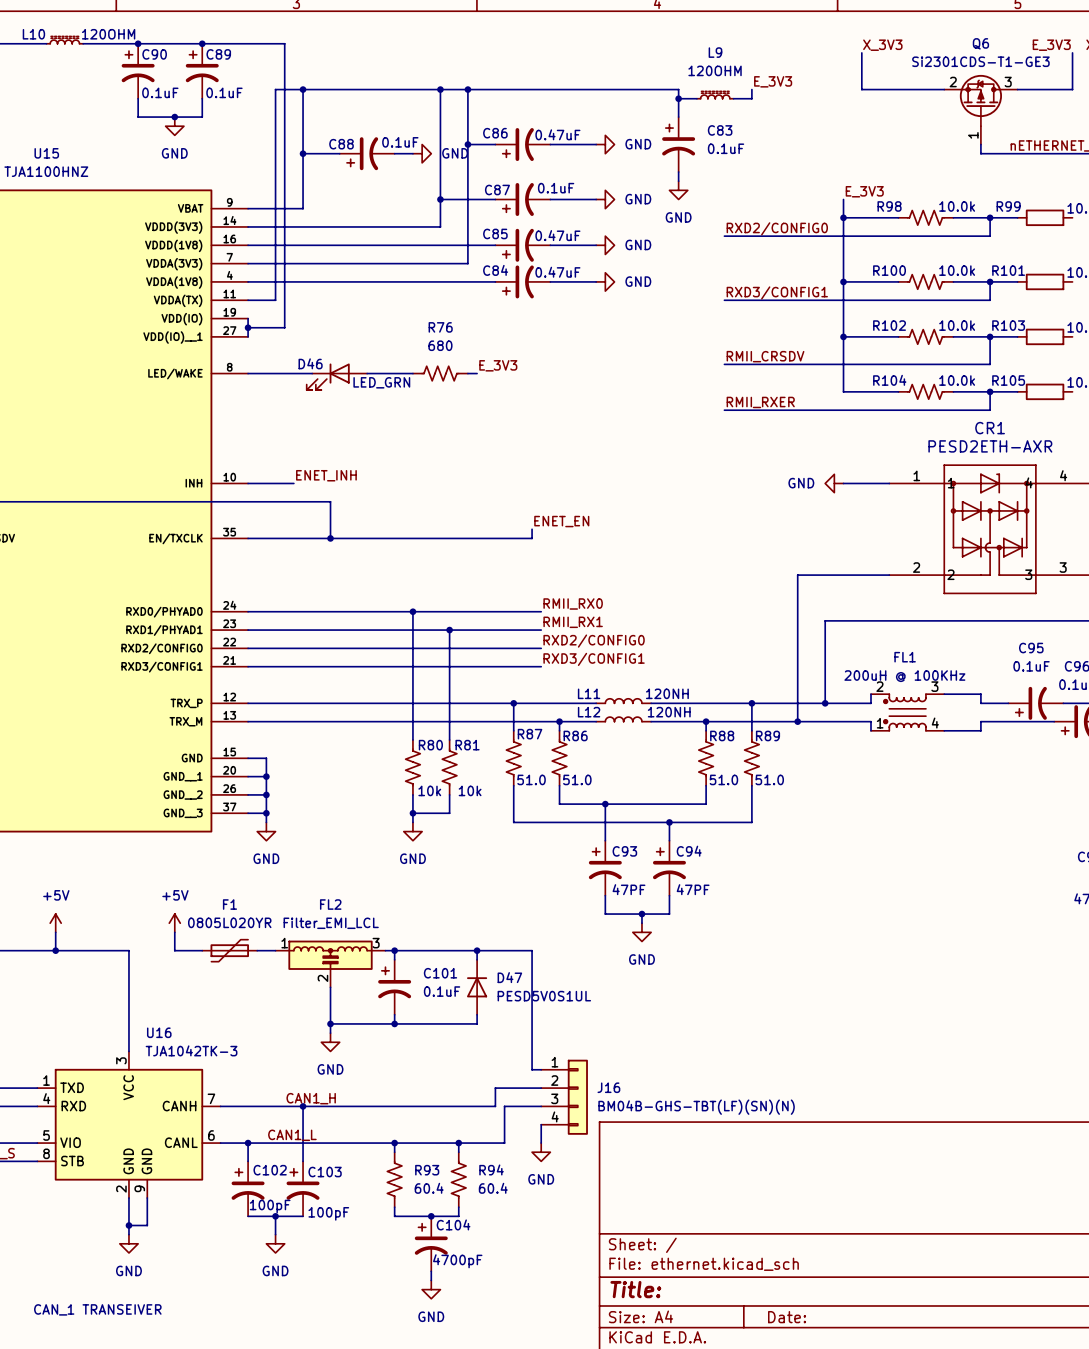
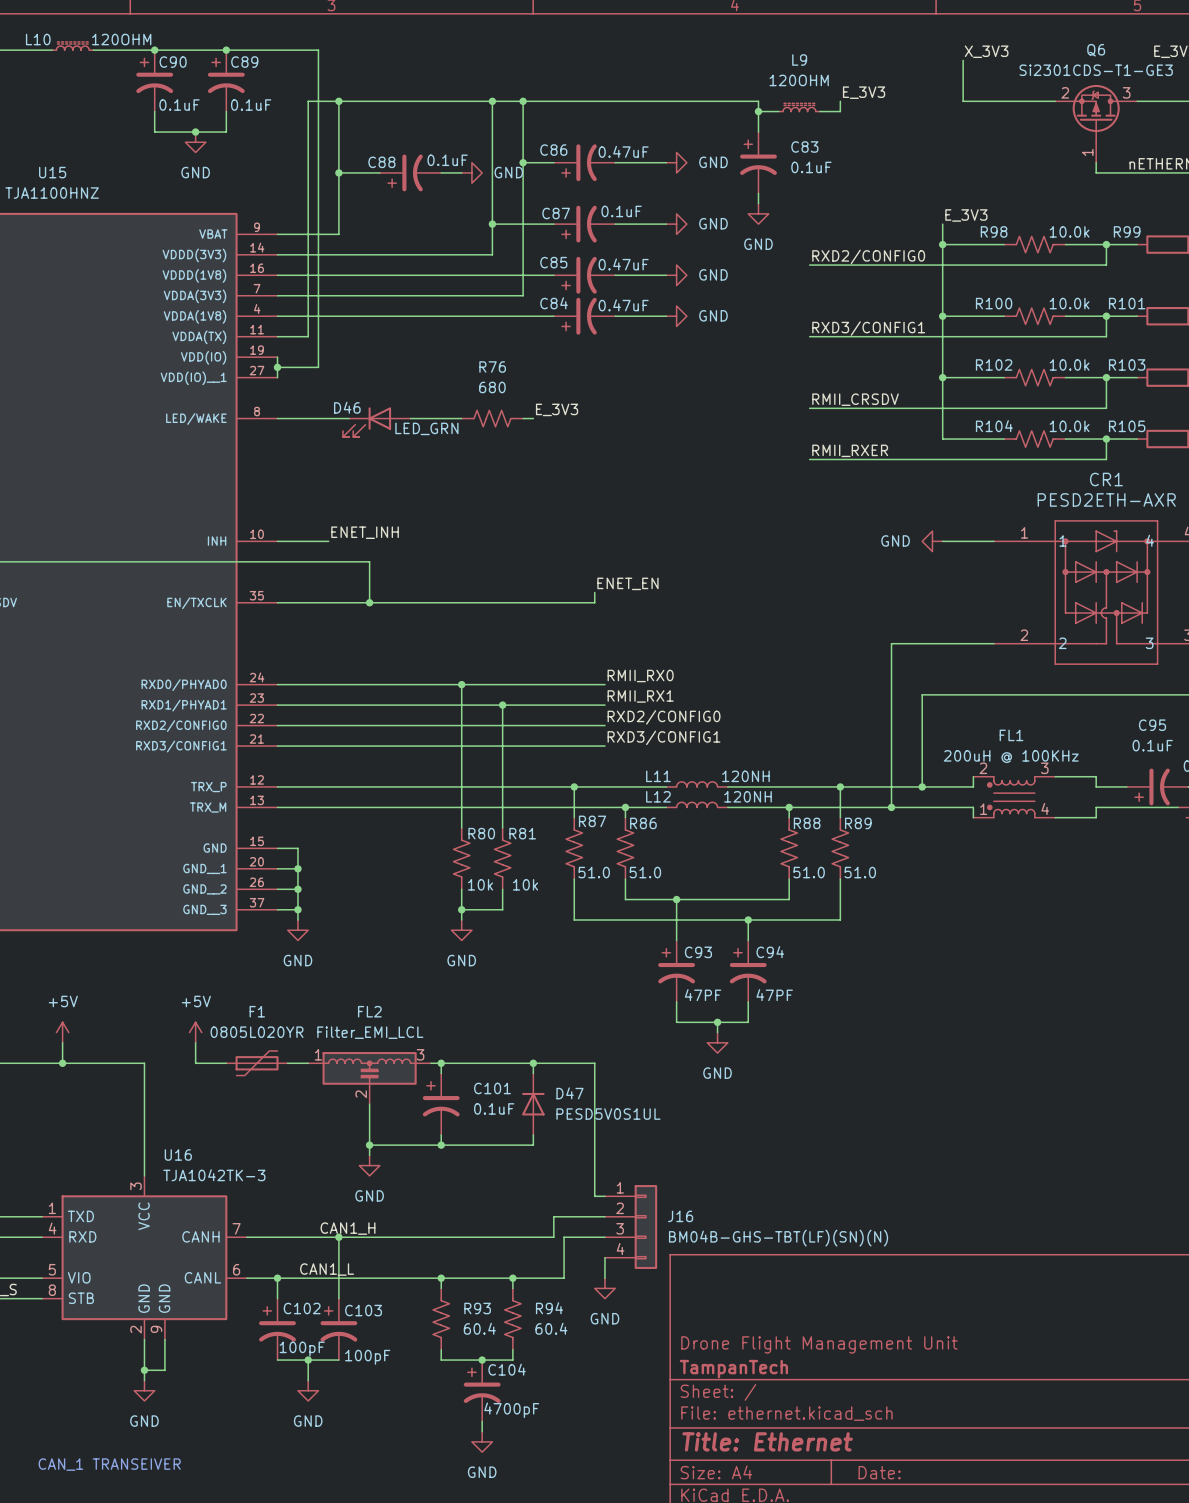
title block: none -> Drone Flight Management Unit (819, 1344)
title block: none -> TampanTech (733, 1369)
title block: Title: (635, 1289) -> Title: Ethernet (767, 1441)

